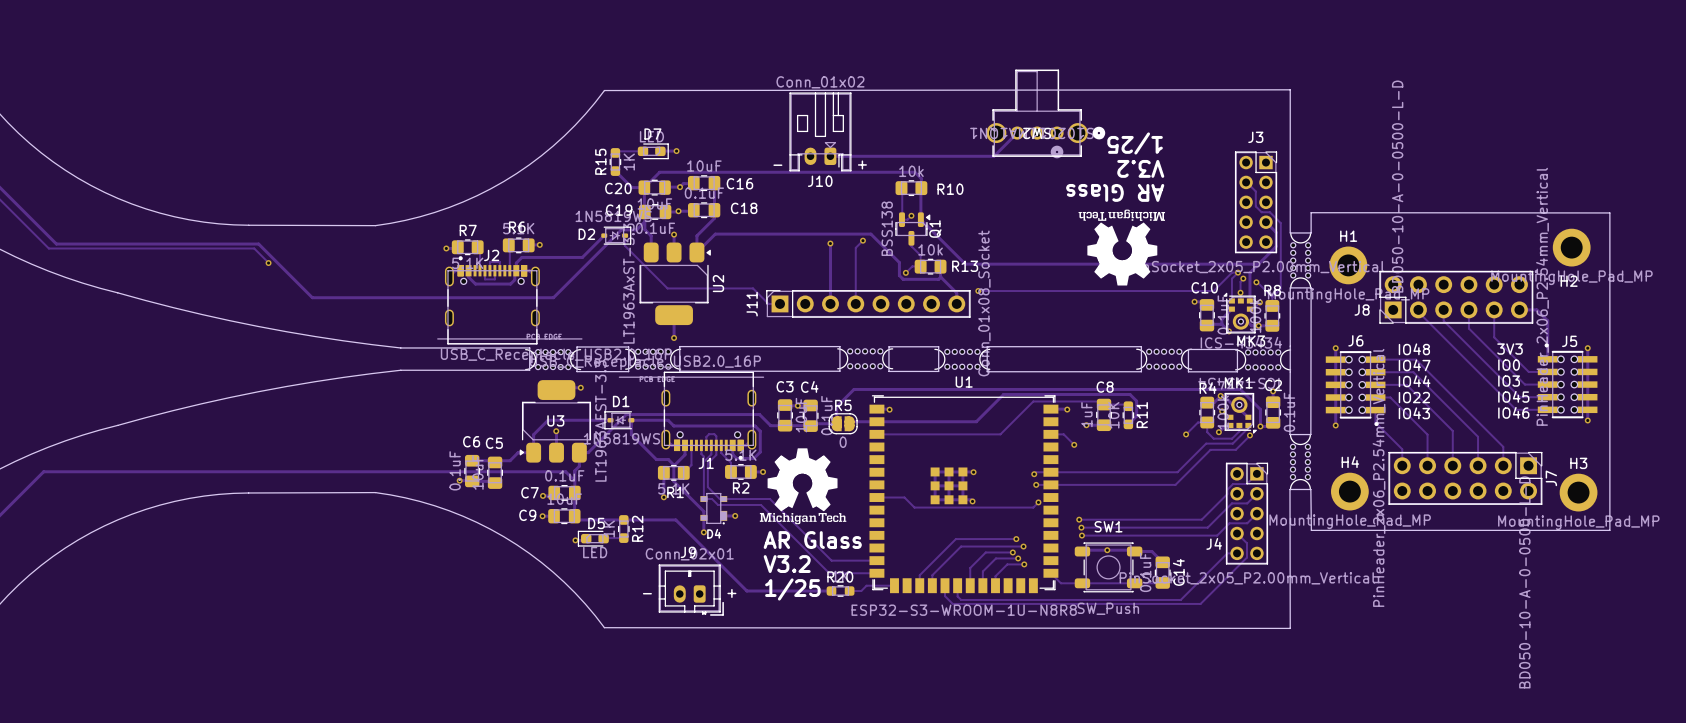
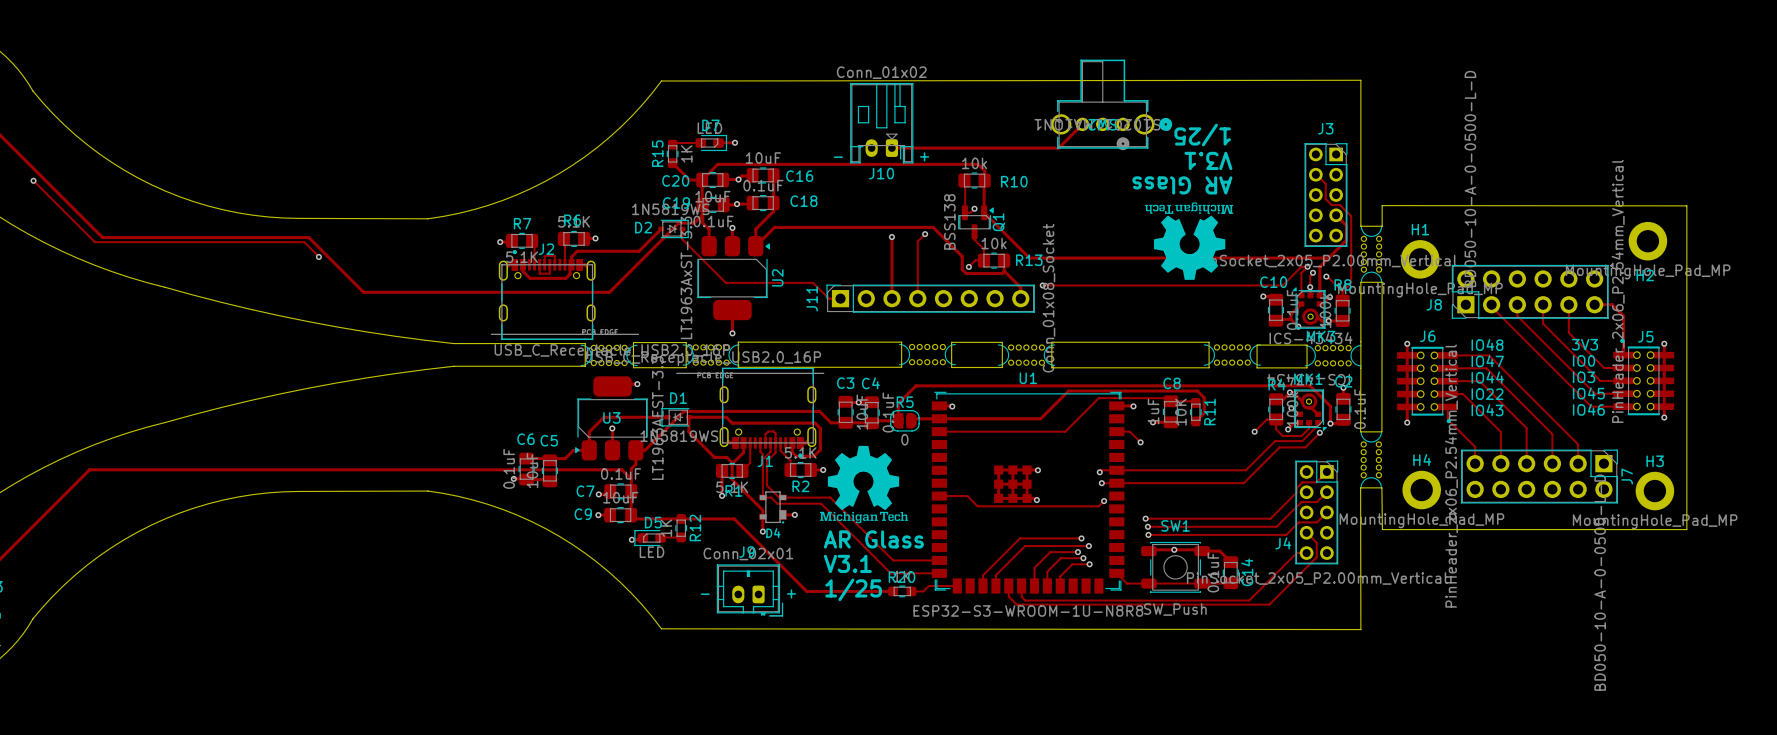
text: V3.2 (1140, 168) -> V3.1 (1208, 160)
text: V3.2 (787, 564) -> V3.1 (847, 563)

